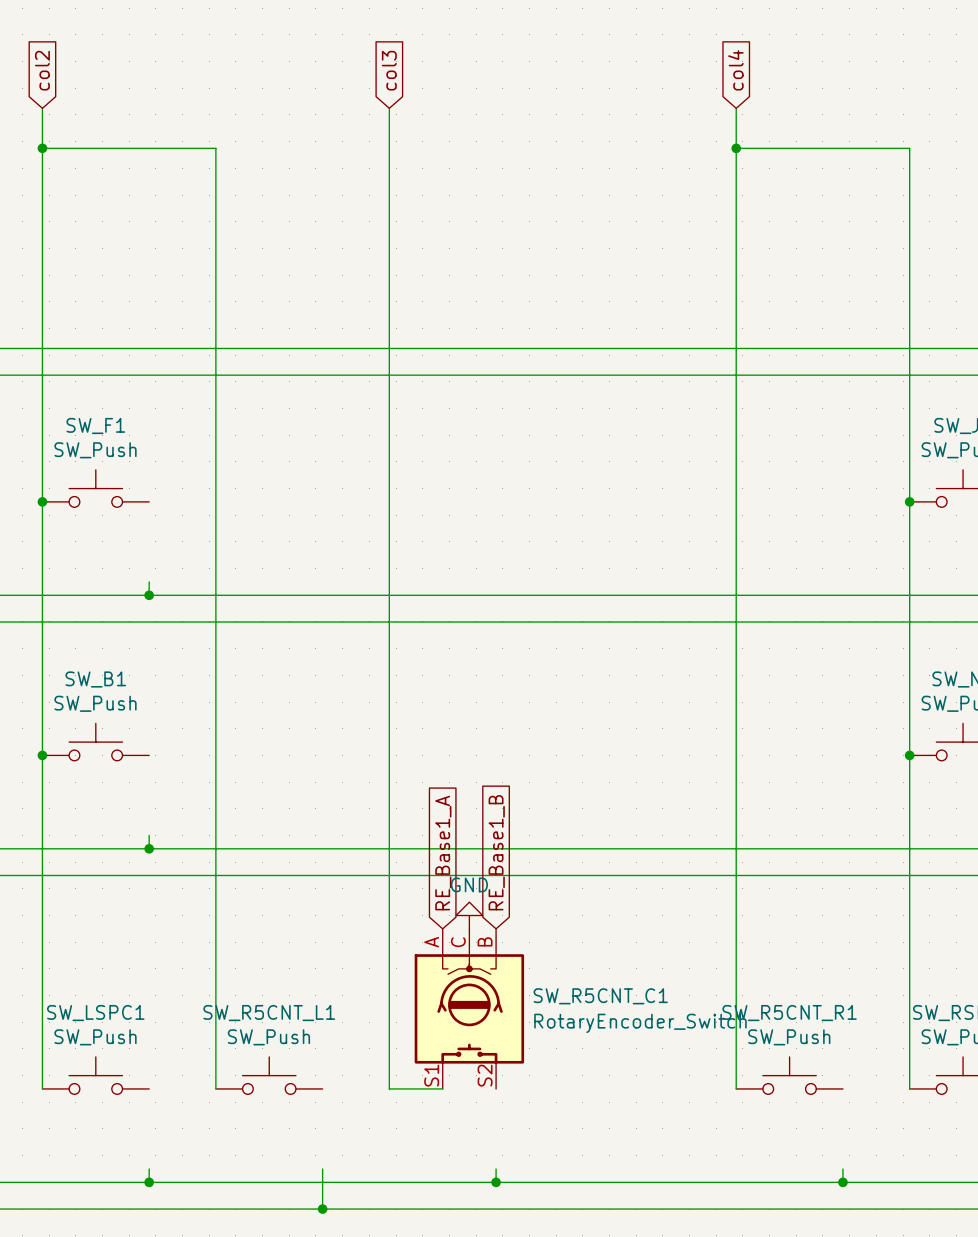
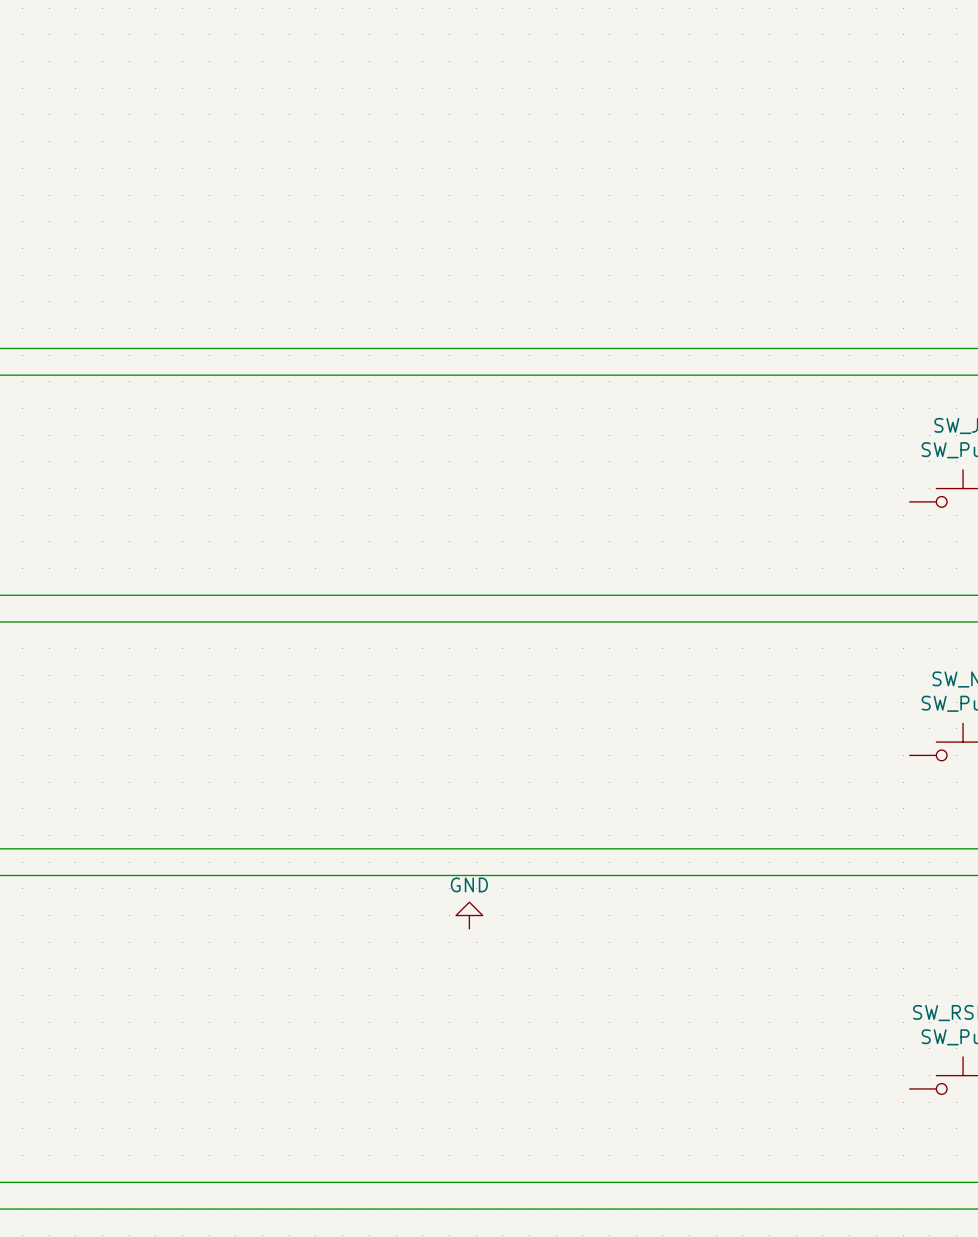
global label: col2 (42, 70) -> none
global label: col3 (389, 70) -> none
global label: col4 (735, 70) -> none
wire: (42, 108) (42, 1088) -> none
wire: (389, 108) (389, 1088) (442, 1088) -> none
wire: (736, 108) (736, 1088) -> none
wire: (42, 148) (215, 148) (215, 1088) -> none
junction: (42, 148) -> none
wire: (736, 148) (909, 148) (909, 1088) -> none
junction: (736, 148) -> none
SW_F1: SW_Push (95, 488) -> none
junction: (42, 501) -> none
junction: (909, 501) -> none
wire: (149, 581) (149, 595) -> none
junction: (149, 595) -> none
SW_B1: SW_Push (95, 742) -> none
junction: (42, 755) -> none
junction: (909, 755) -> none
wire: (149, 835) (149, 848) -> none
junction: (149, 848) -> none
global label: RE_Base1_B (496, 852) -> none
global label: RE_Base1_A (443, 853) -> none
SW_R5CNT_C1: RotaryEncoder_Switch (469, 1008) -> none
SW_LSPC1: SW_Push (95, 1075) -> none
SW_R5CNT_L1: SW_Push (269, 1075) -> none
SW_R5CNT_R1: SW_Push (789, 1075) -> none
wire: (149, 1169) (149, 1182) -> none
wire: (322, 1169) (322, 1209) -> none
wire: (496, 1169) (496, 1182) -> none
wire: (842, 1169) (842, 1182) -> none
junction: (149, 1182) -> none
junction: (496, 1182) -> none
junction: (842, 1182) -> none
junction: (322, 1209) -> none

